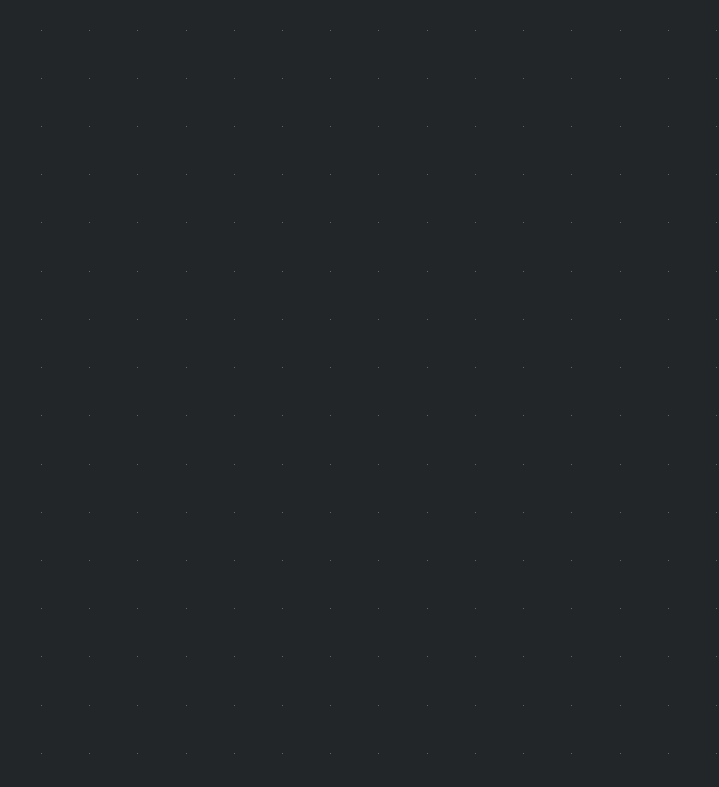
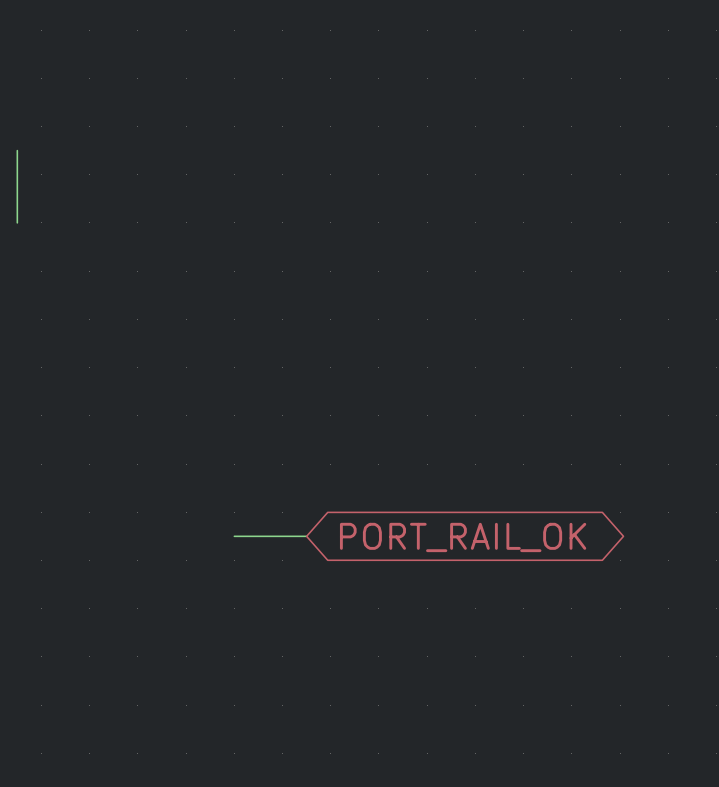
wire: none -> (17, 150) (17, 222)
wire: none -> (234, 536) (306, 536)
global label: none -> PORT_RAIL_OK (463, 537)

